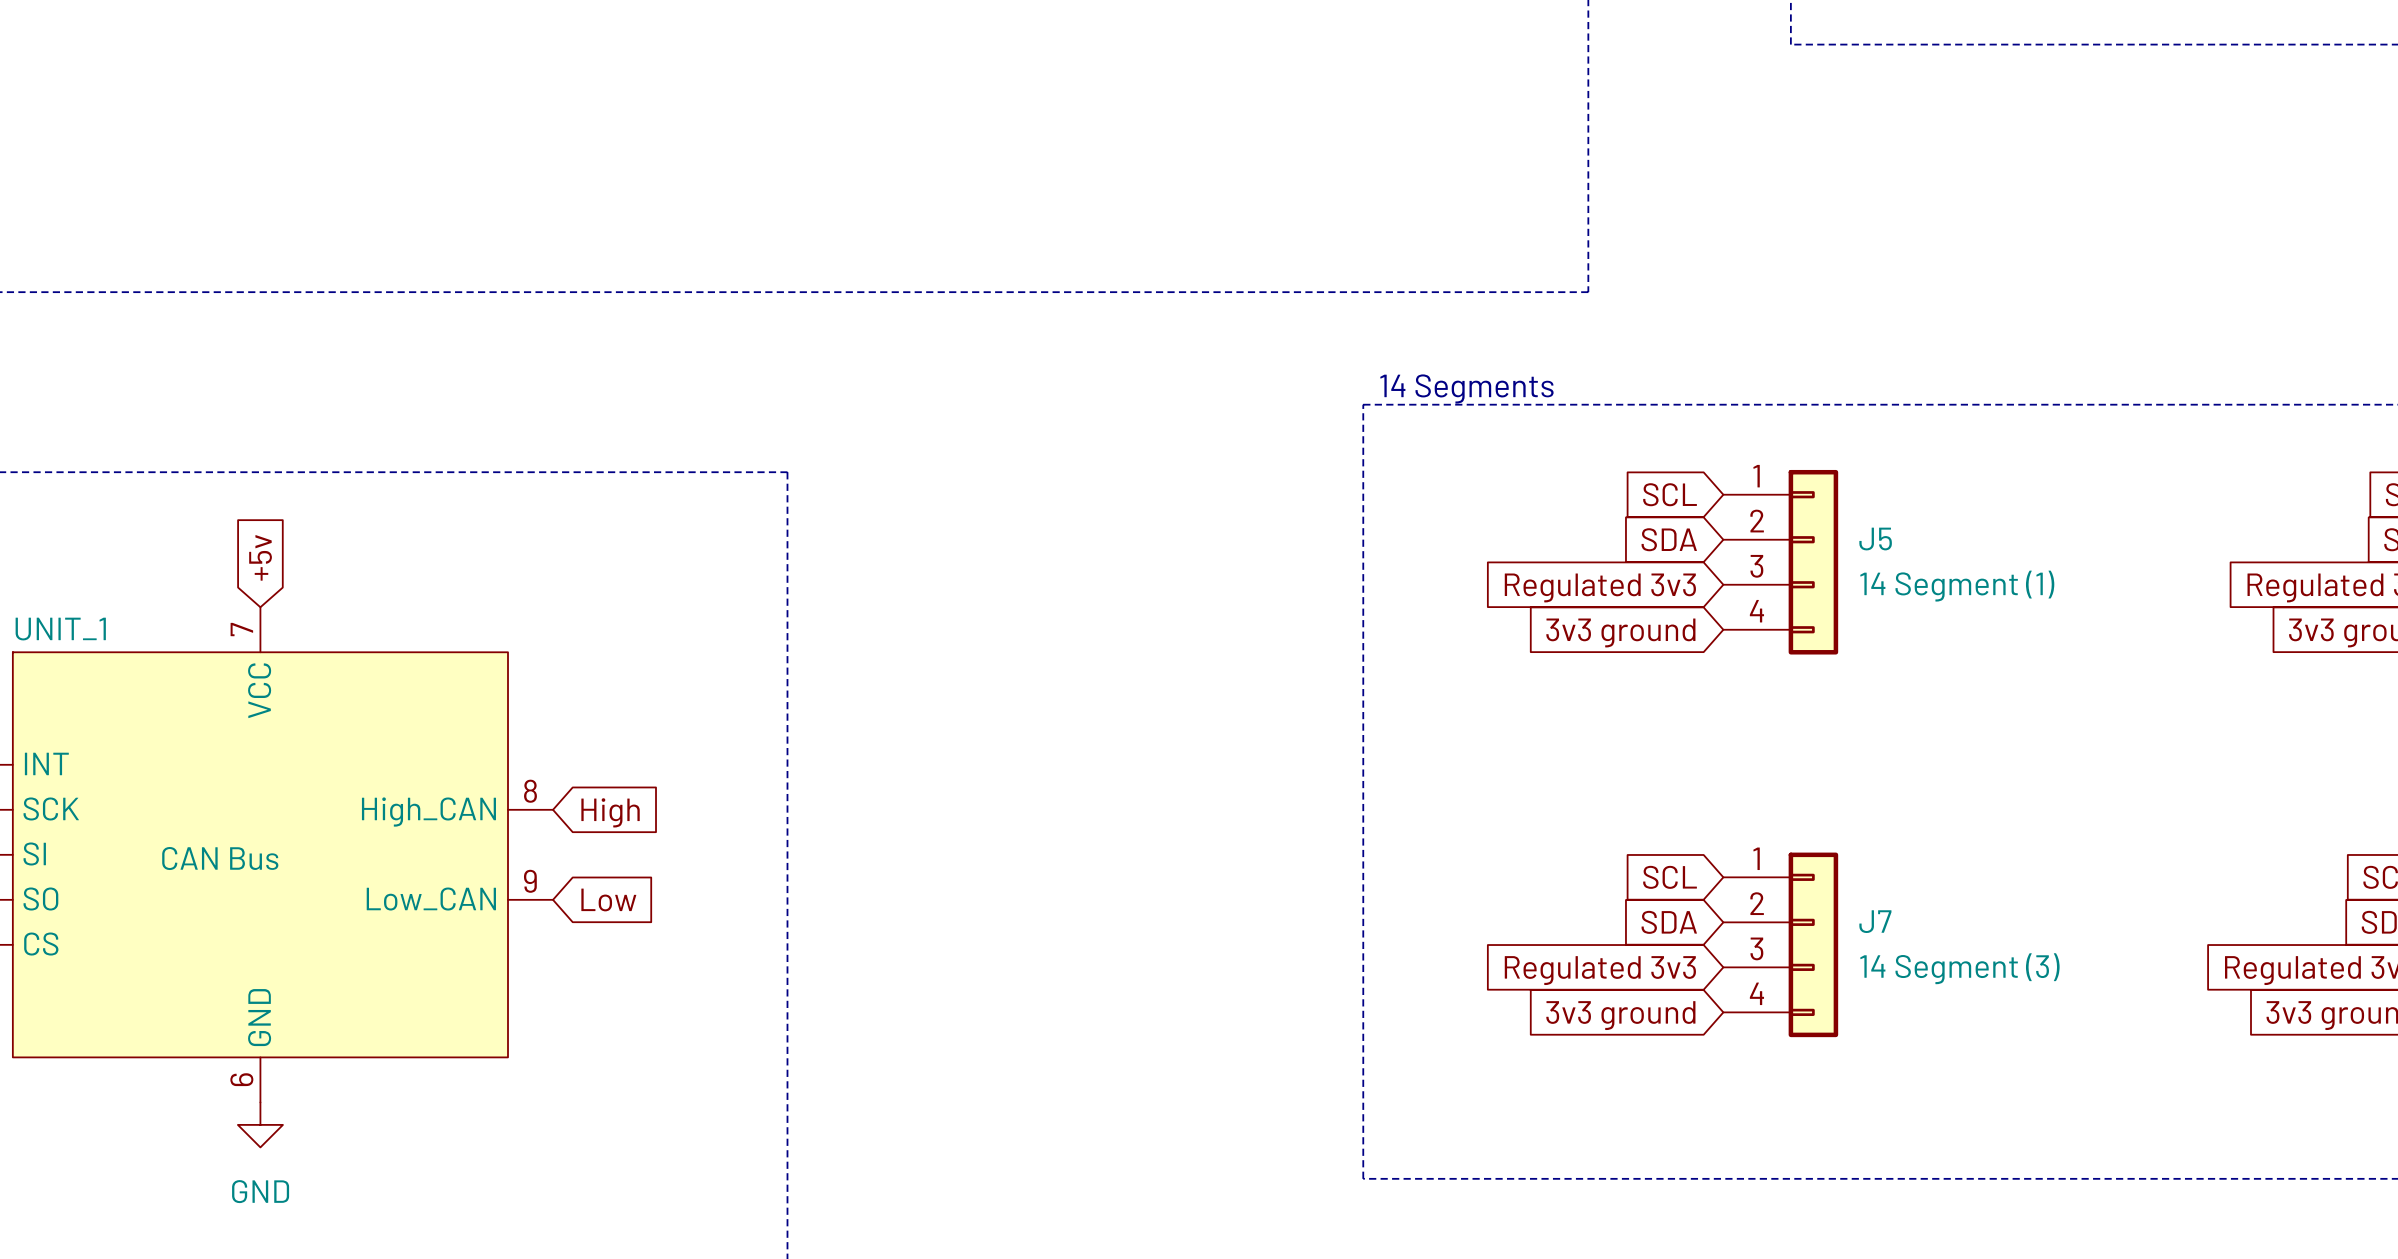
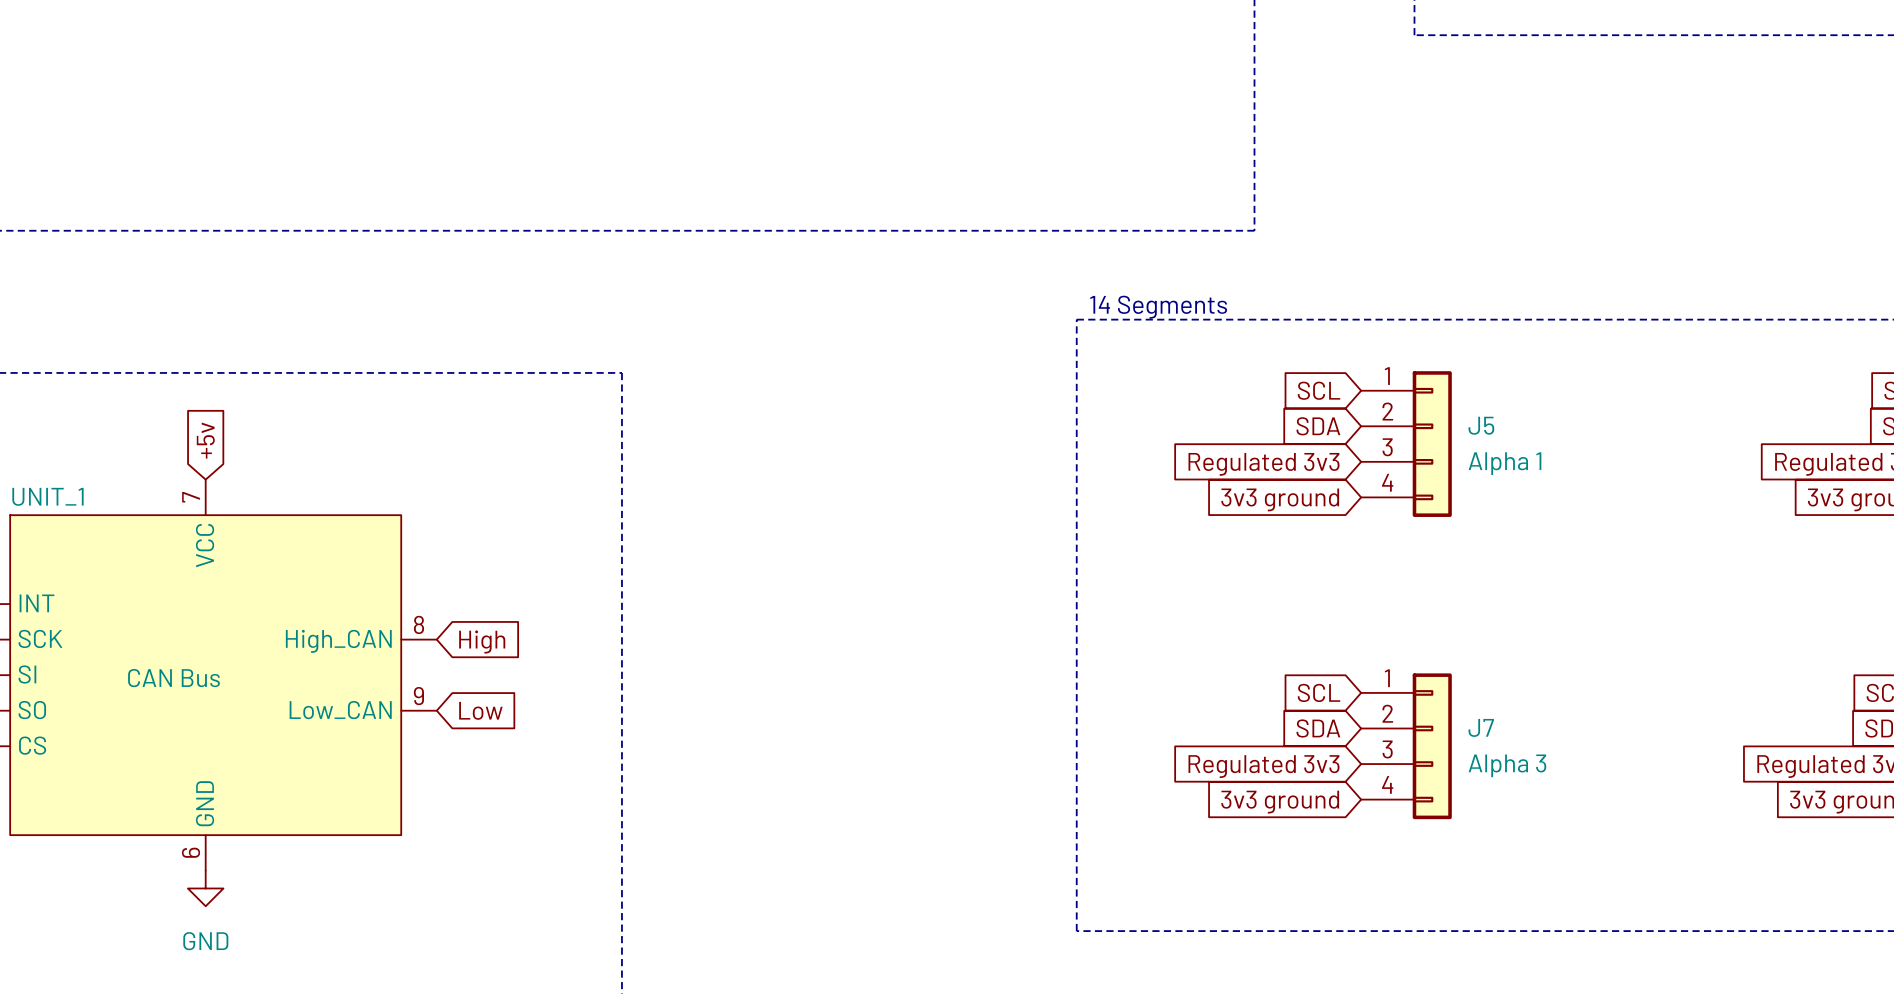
J5 value: 14 Segment (1) (1957, 586) -> Alpha 1 (1505, 463)
J7 value: 14 Segment (3) (1959, 968) -> Alpha 3 (1507, 765)

